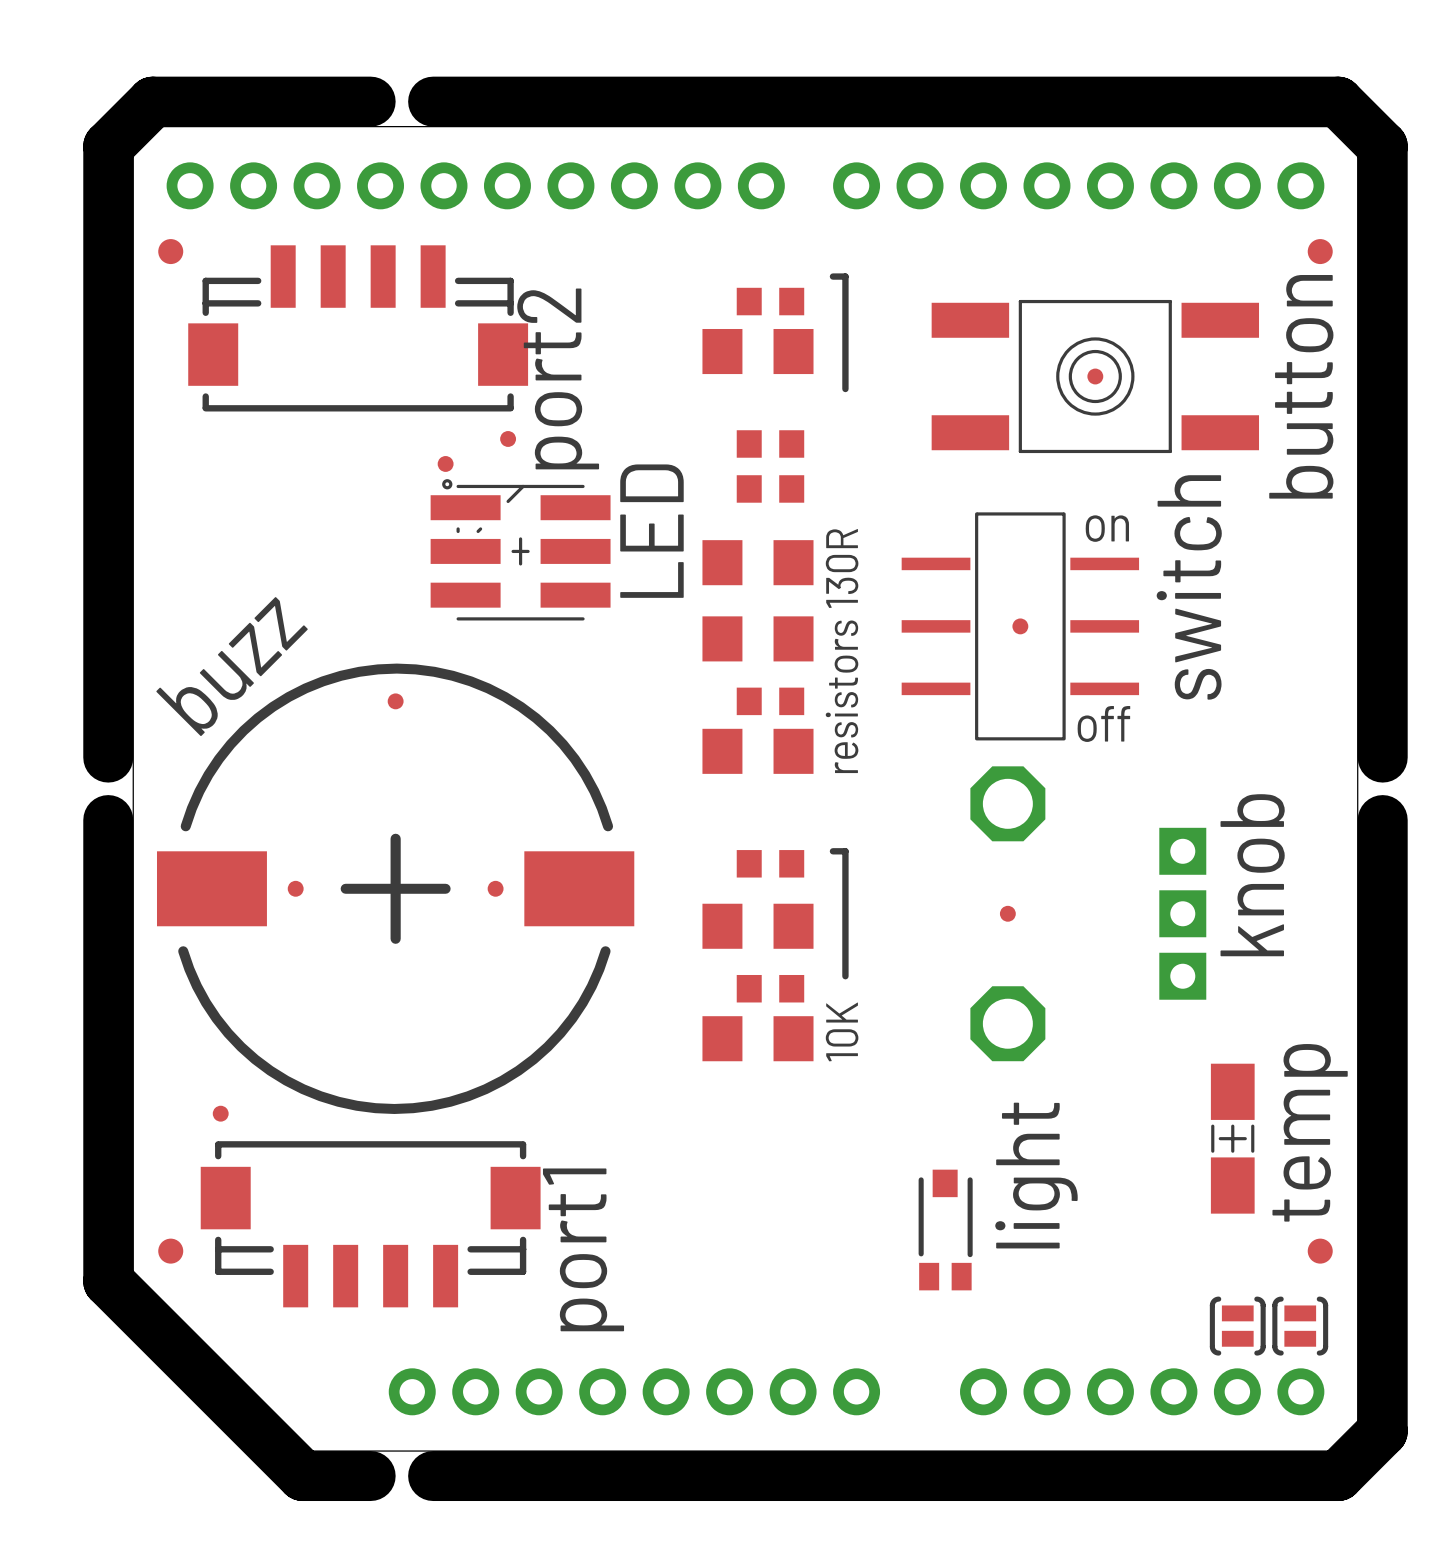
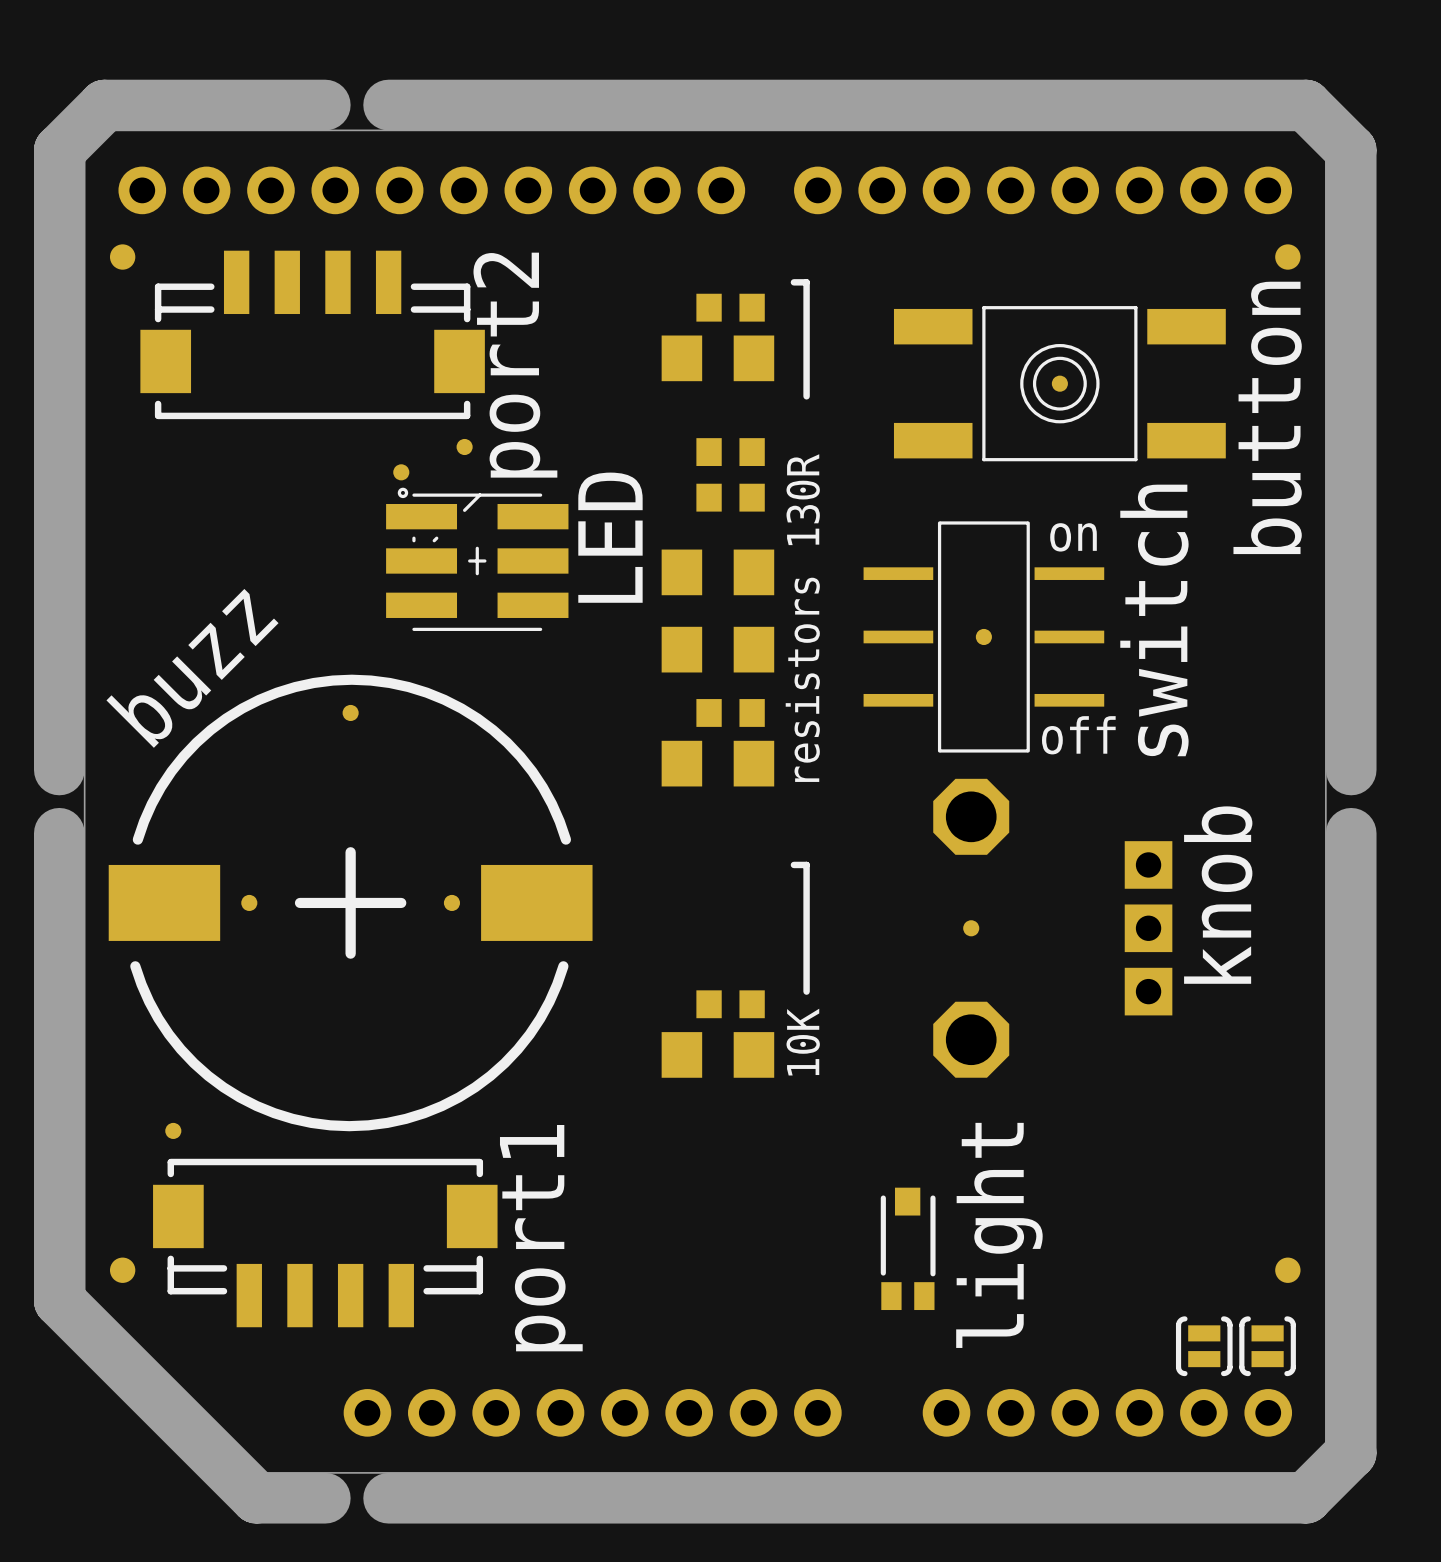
part: (770, 863) -> none
part: (757, 926) -> none
text: temp (1310, 1132) -> none
part: (1232, 1138) -> none

